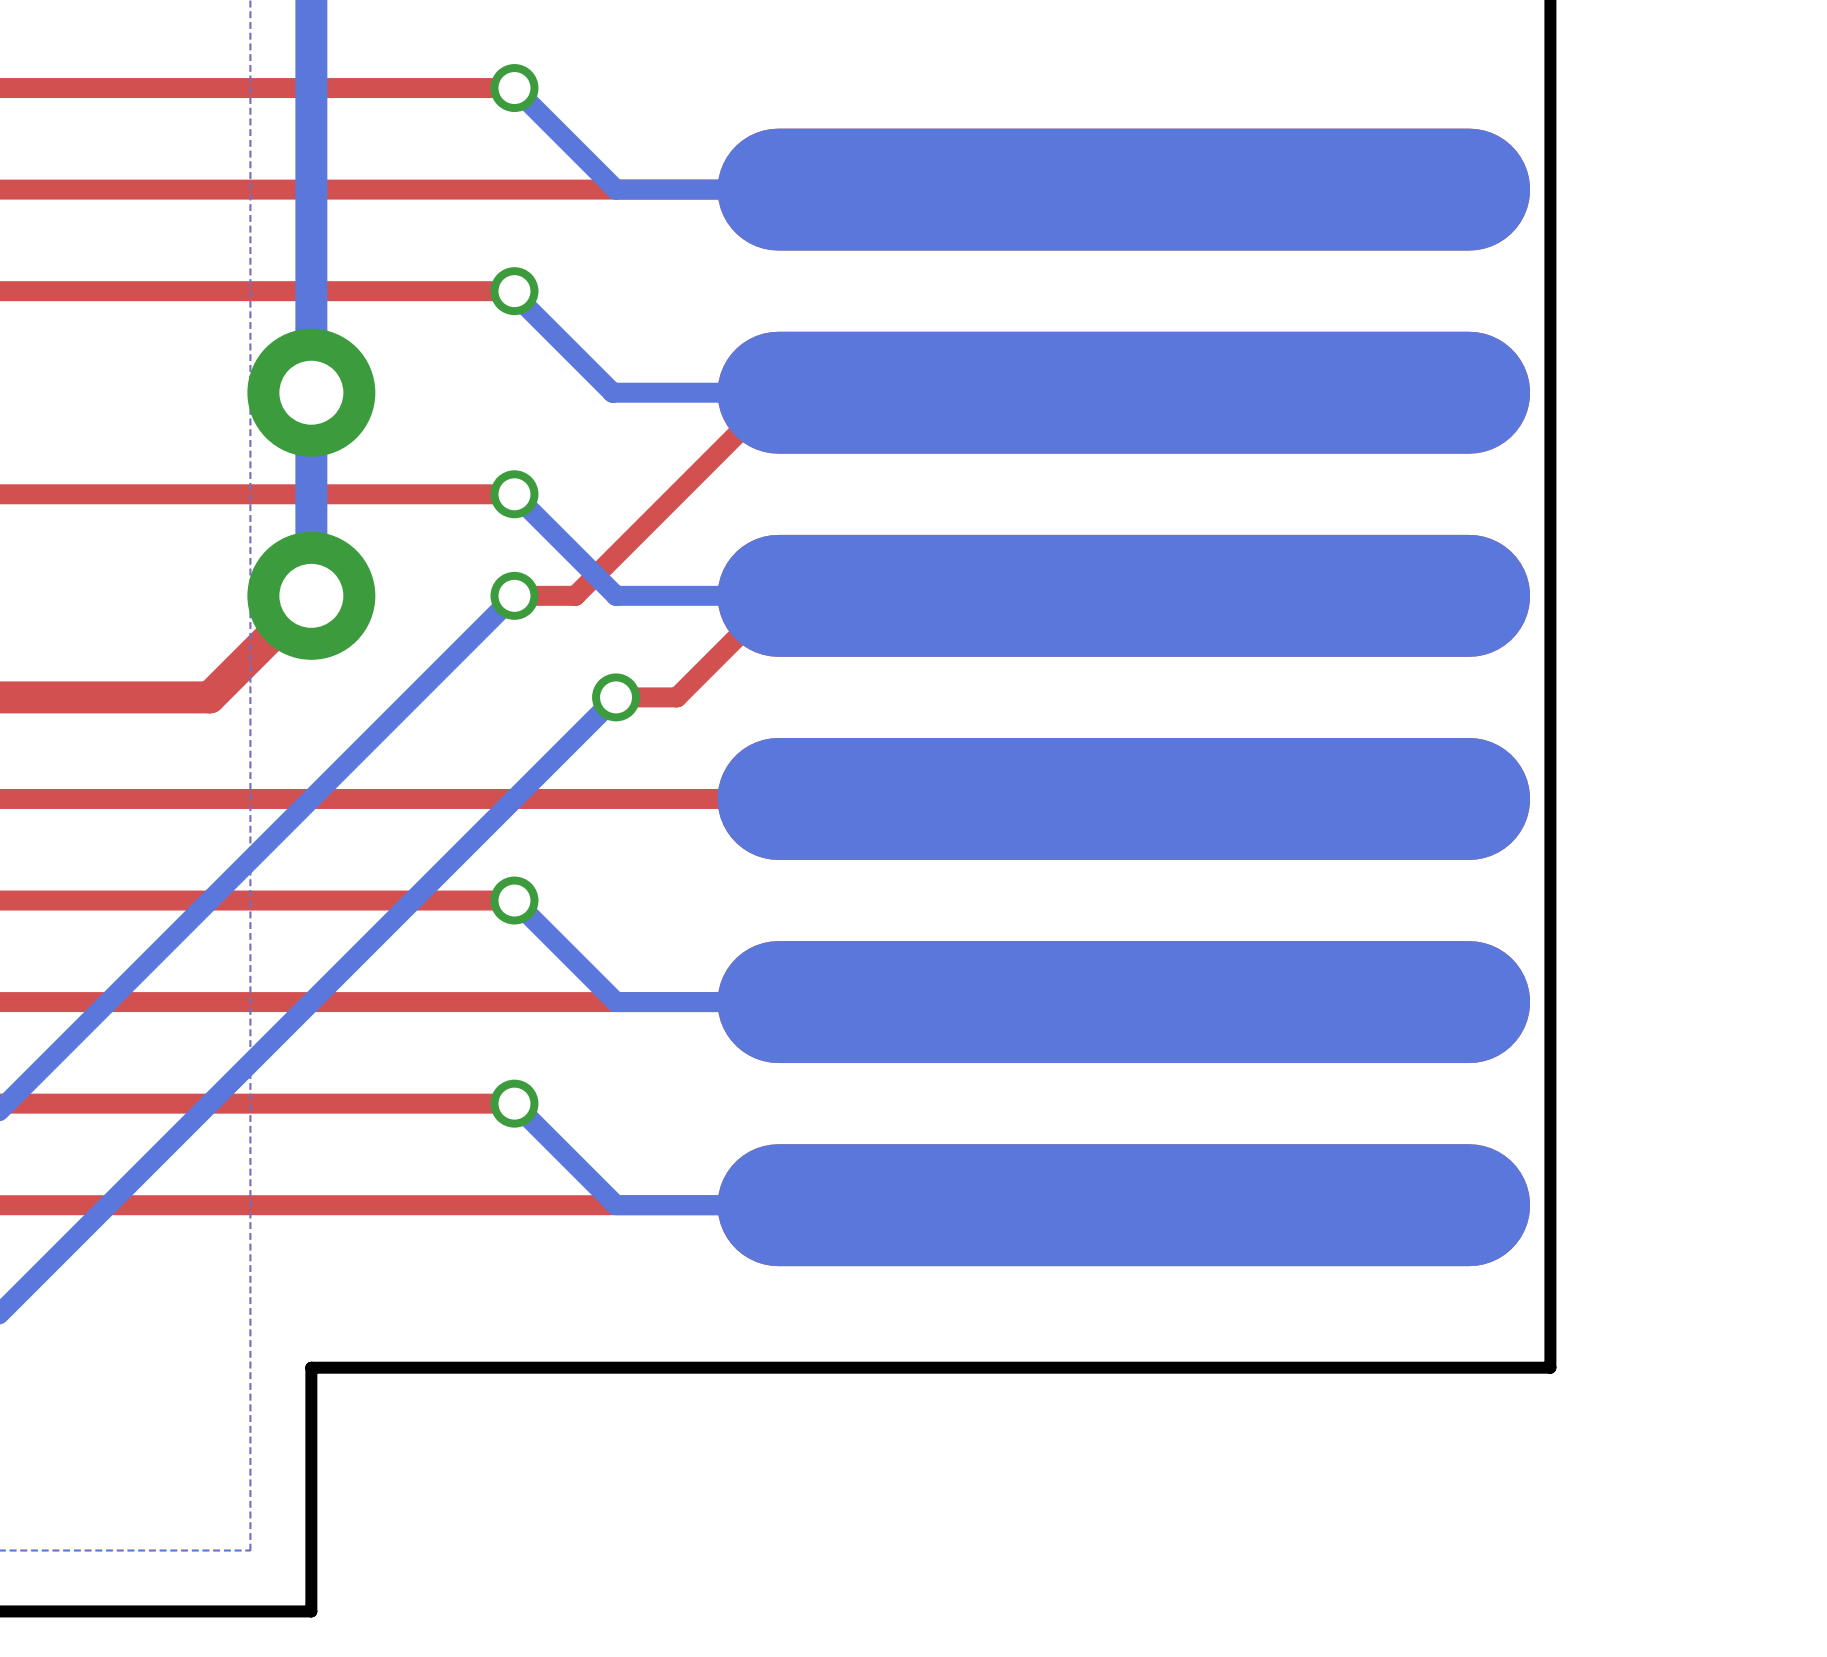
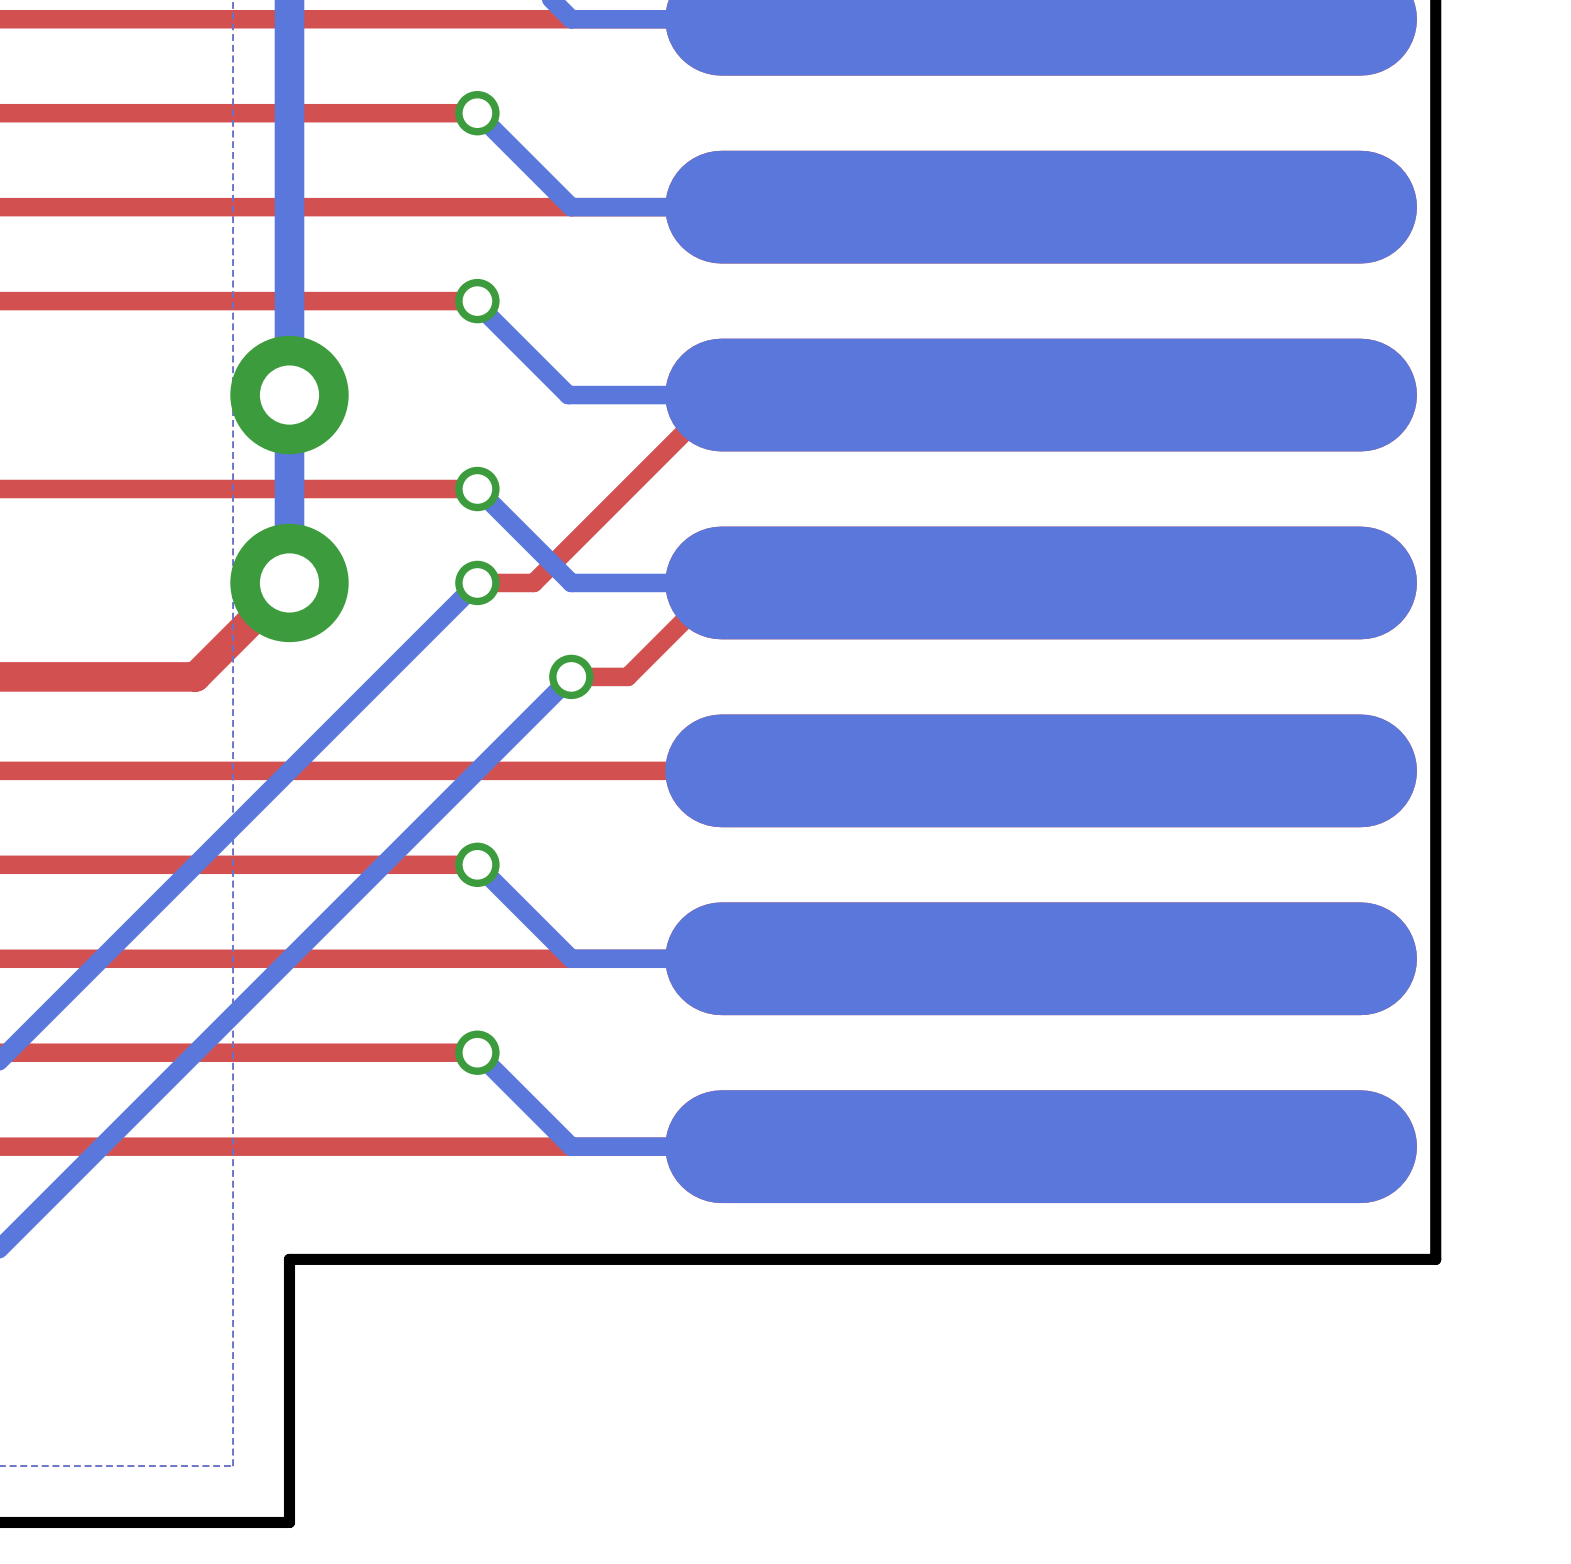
board edge: (1550, 1327) (1550, 1367) (311, 1367) -> (1435, 1259) (289, 1259) (289, 1297)

